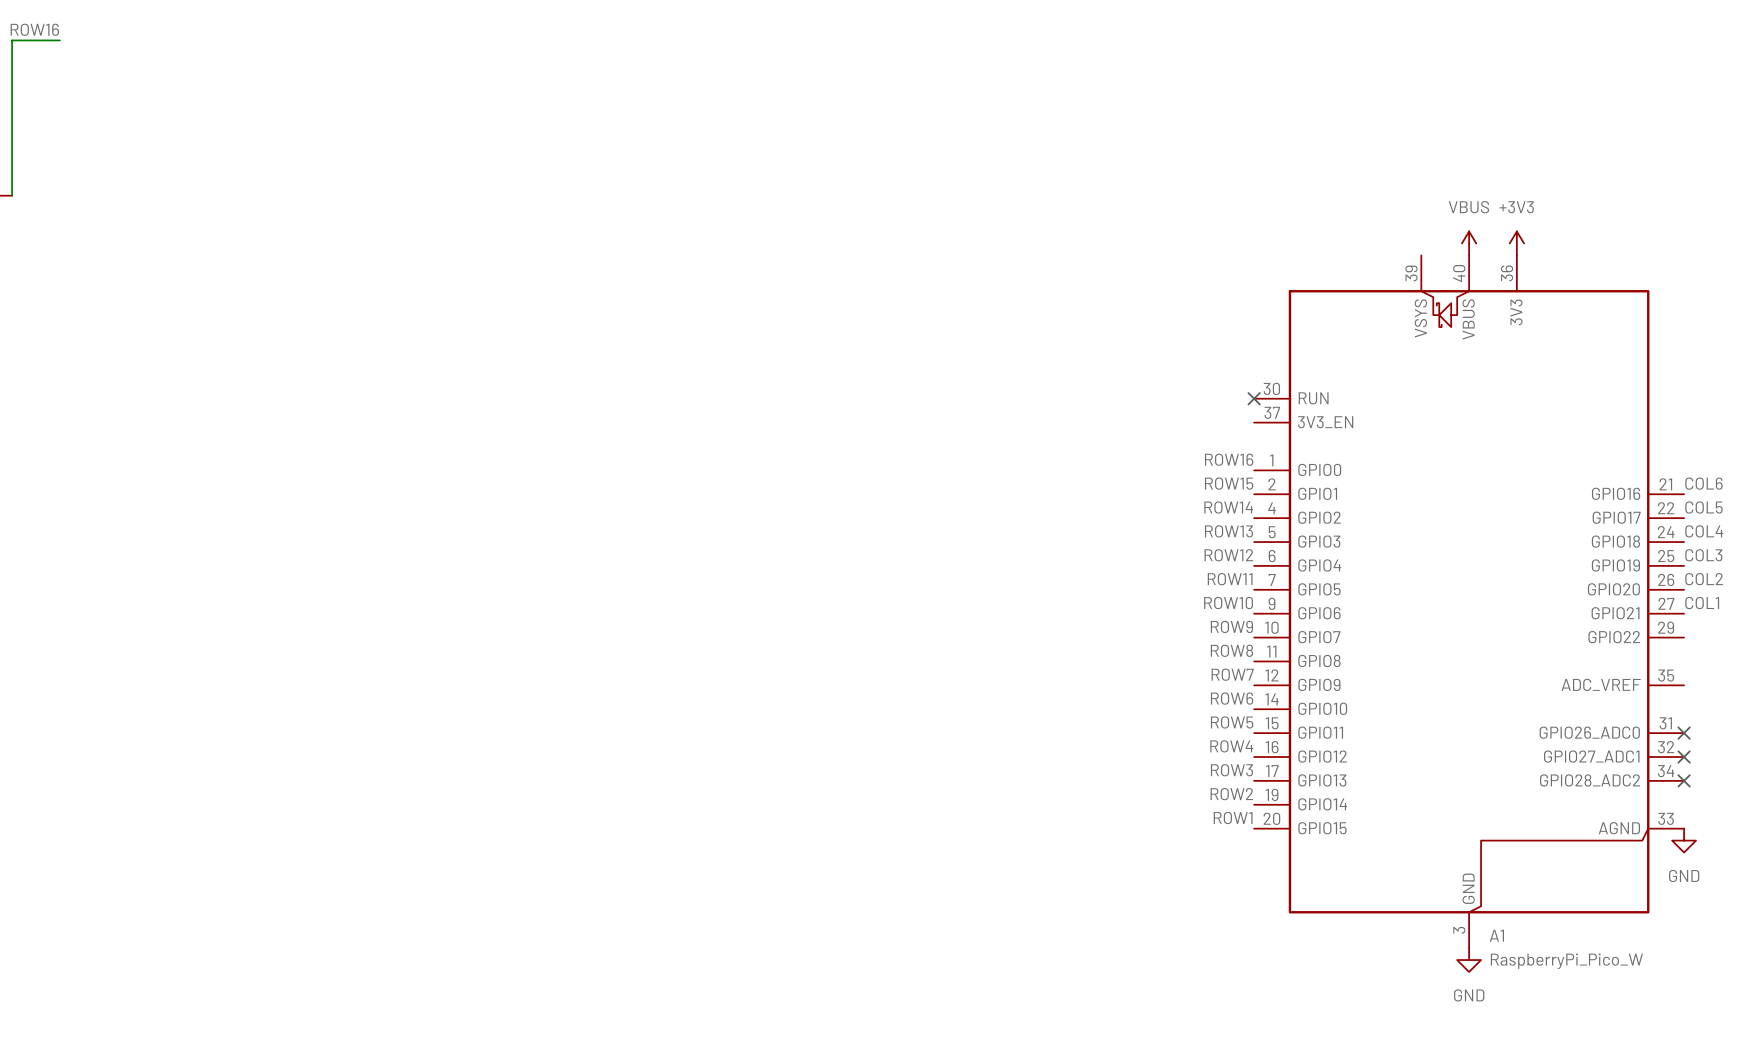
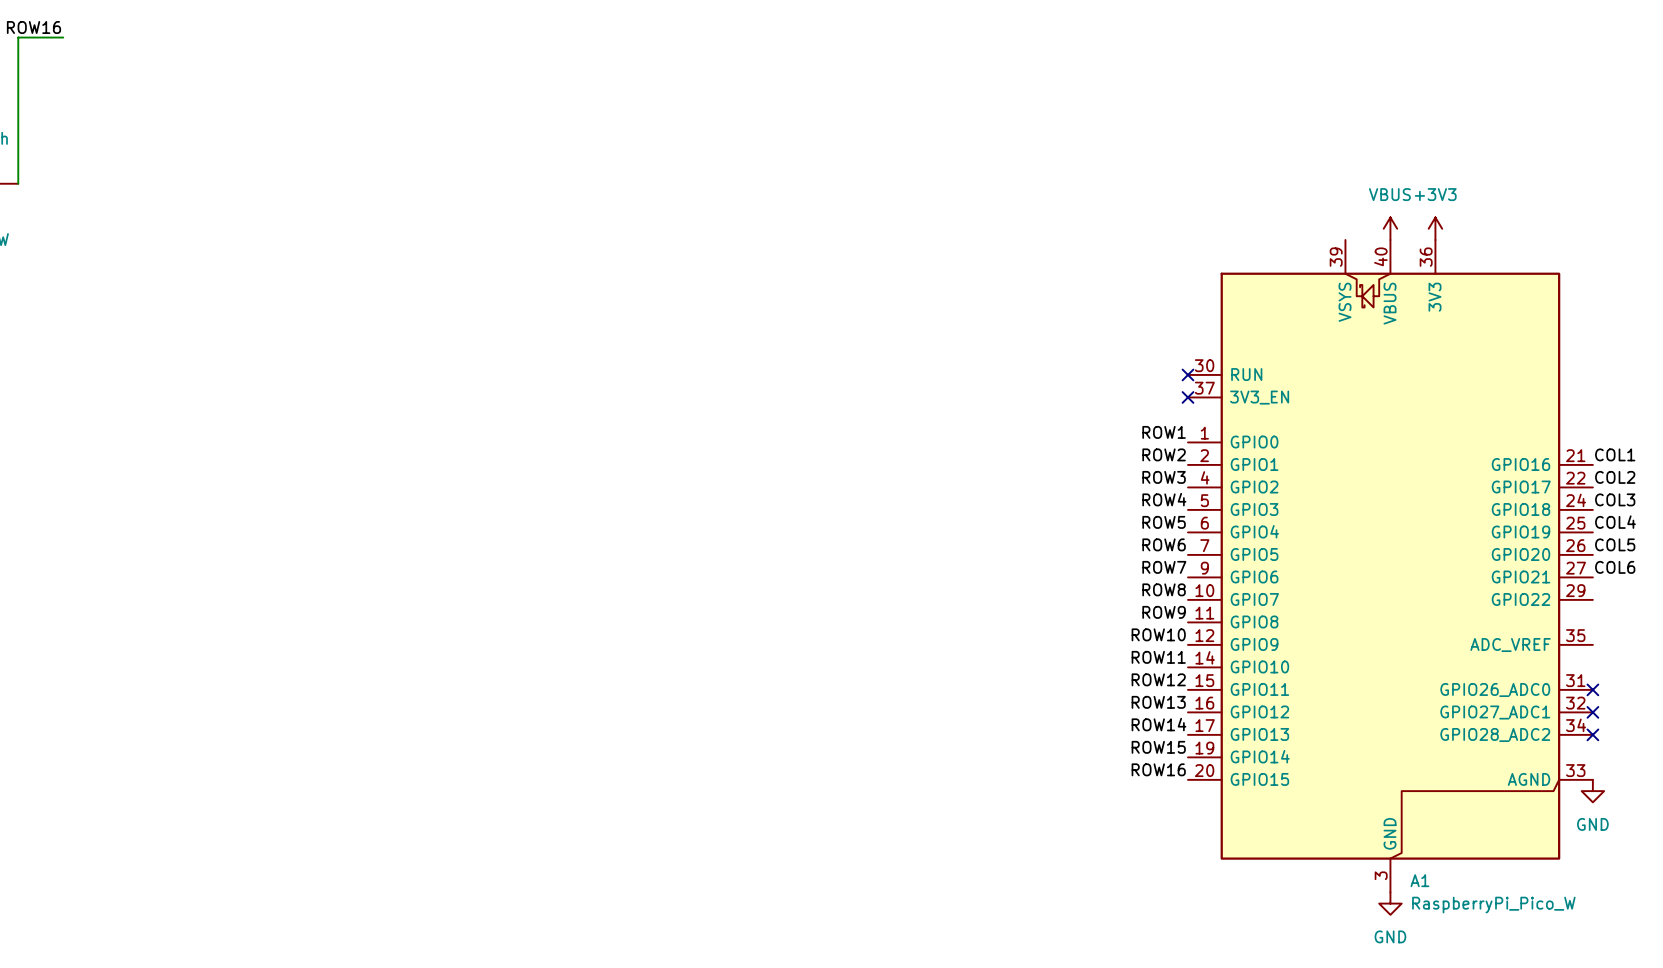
no-connect mark: none -> (1187, 397)
label: ROW16 (1229, 459) -> ROW1 (1164, 432)
label: ROW15 (1229, 483) -> ROW2 (1164, 454)
label: COL6 (1703, 483) -> COL1 (1615, 454)
label: ROW14 (1228, 507) -> ROW3 (1164, 477)
label: COL5 (1703, 507) -> COL2 (1615, 477)
label: ROW13 (1228, 531) -> ROW4 (1164, 499)
label: COL4 (1704, 531) -> COL3 (1615, 499)
label: ROW12 (1228, 555) -> ROW5 (1164, 522)
label: COL3 (1703, 555) -> COL4 (1615, 522)
label: ROW11 (1230, 579) -> ROW6 (1164, 544)
label: COL2 (1704, 579) -> COL5 (1615, 544)
label: ROW10 (1228, 603) -> ROW7 (1164, 567)
label: COL1 (1702, 603) -> COL6 (1615, 567)
label: ROW9 (1231, 626) -> ROW8 (1164, 589)
label: ROW8 (1231, 650) -> ROW9 (1164, 612)
label: ROW7 (1232, 674) -> ROW10 (1158, 634)
label: ROW6 (1232, 698) -> ROW11 (1158, 657)
label: ROW5 (1232, 722) -> ROW12 (1158, 679)
label: ROW4 (1231, 746) -> ROW13 (1158, 702)
label: ROW3 (1231, 770) -> ROW14 (1158, 724)
label: ROW2 (1231, 794) -> ROW15 (1158, 747)
label: ROW1 (1233, 818) -> ROW16 (1158, 769)

